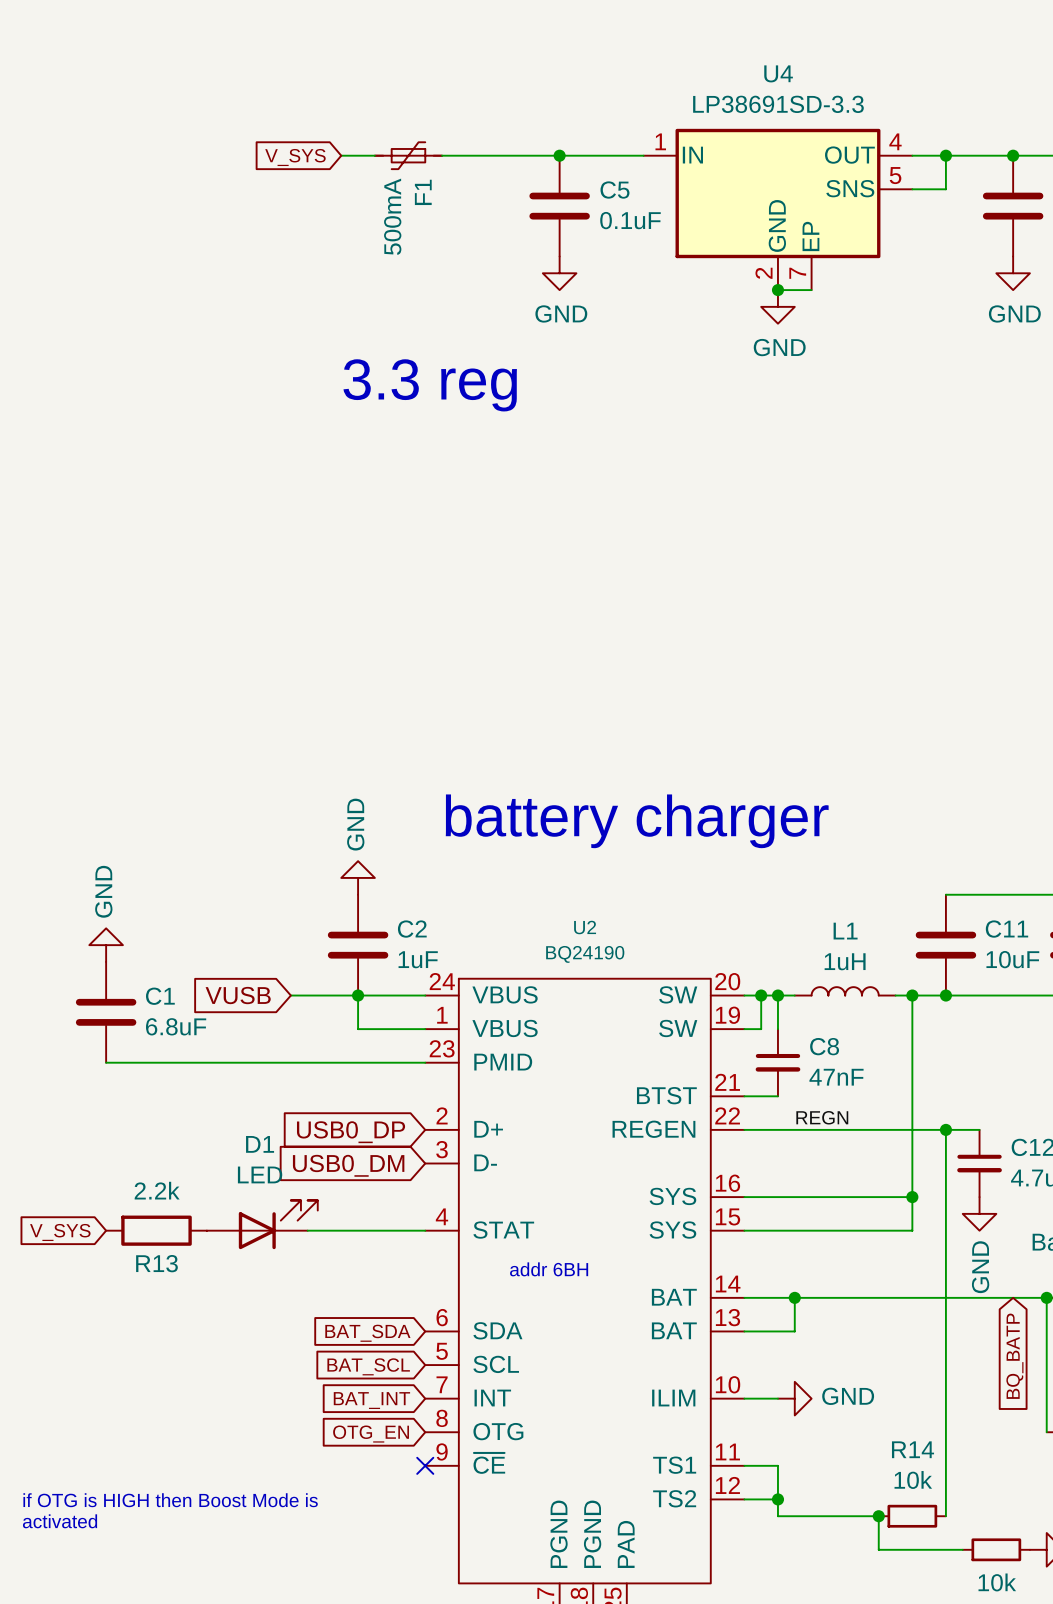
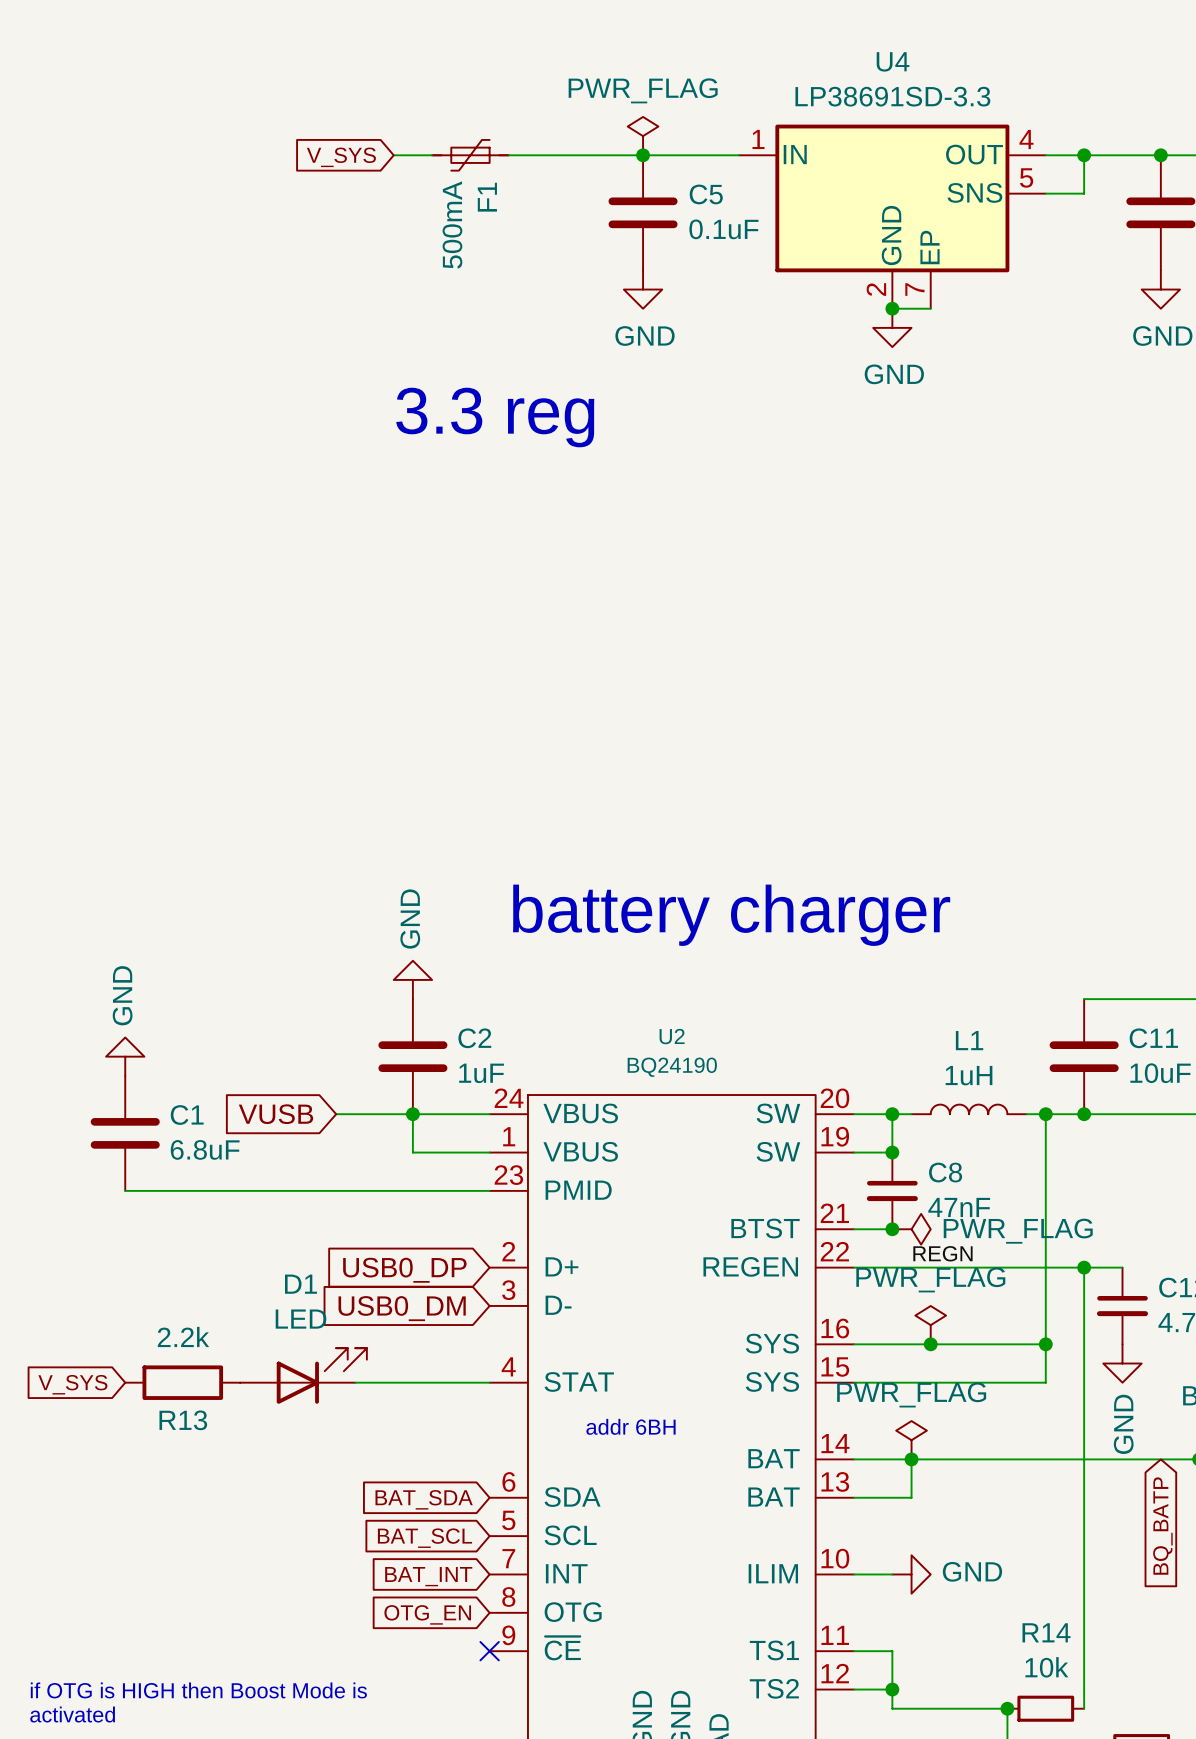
power symbol: none -> PWR_FLAG (643, 136)
wire: (761, 995) (761, 1029) -> (892, 1152) (873, 1152)
junction position: (761, 995) -> (892, 1152)
junction: none -> (892, 1229)
power symbol: none -> PWR_FLAG (911, 1229)
power symbol: none -> PWR_FLAG (930, 1325)
junction: none -> (930, 1344)
power symbol: none -> PWR_FLAG (911, 1440)

